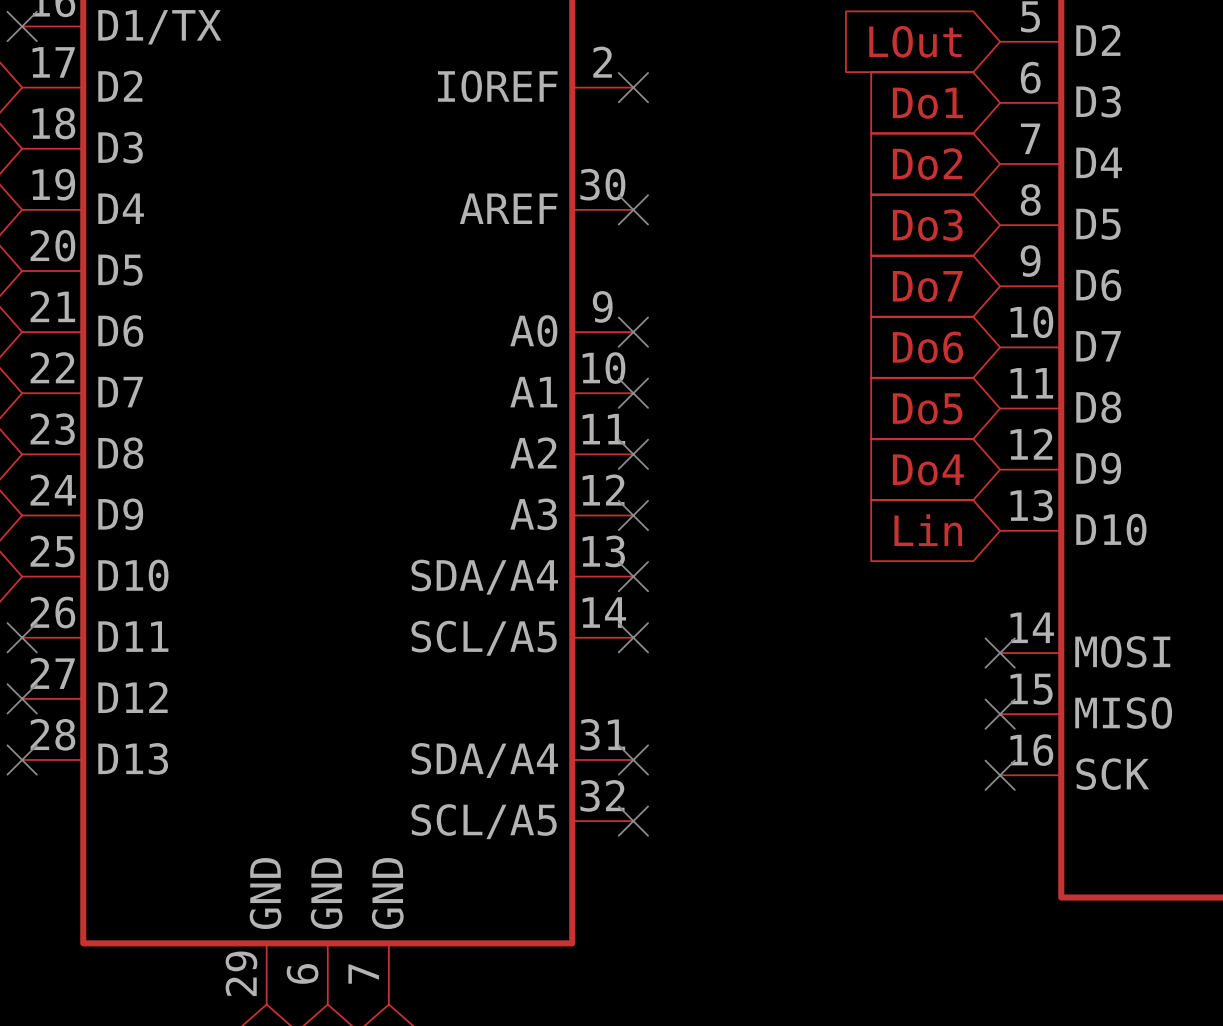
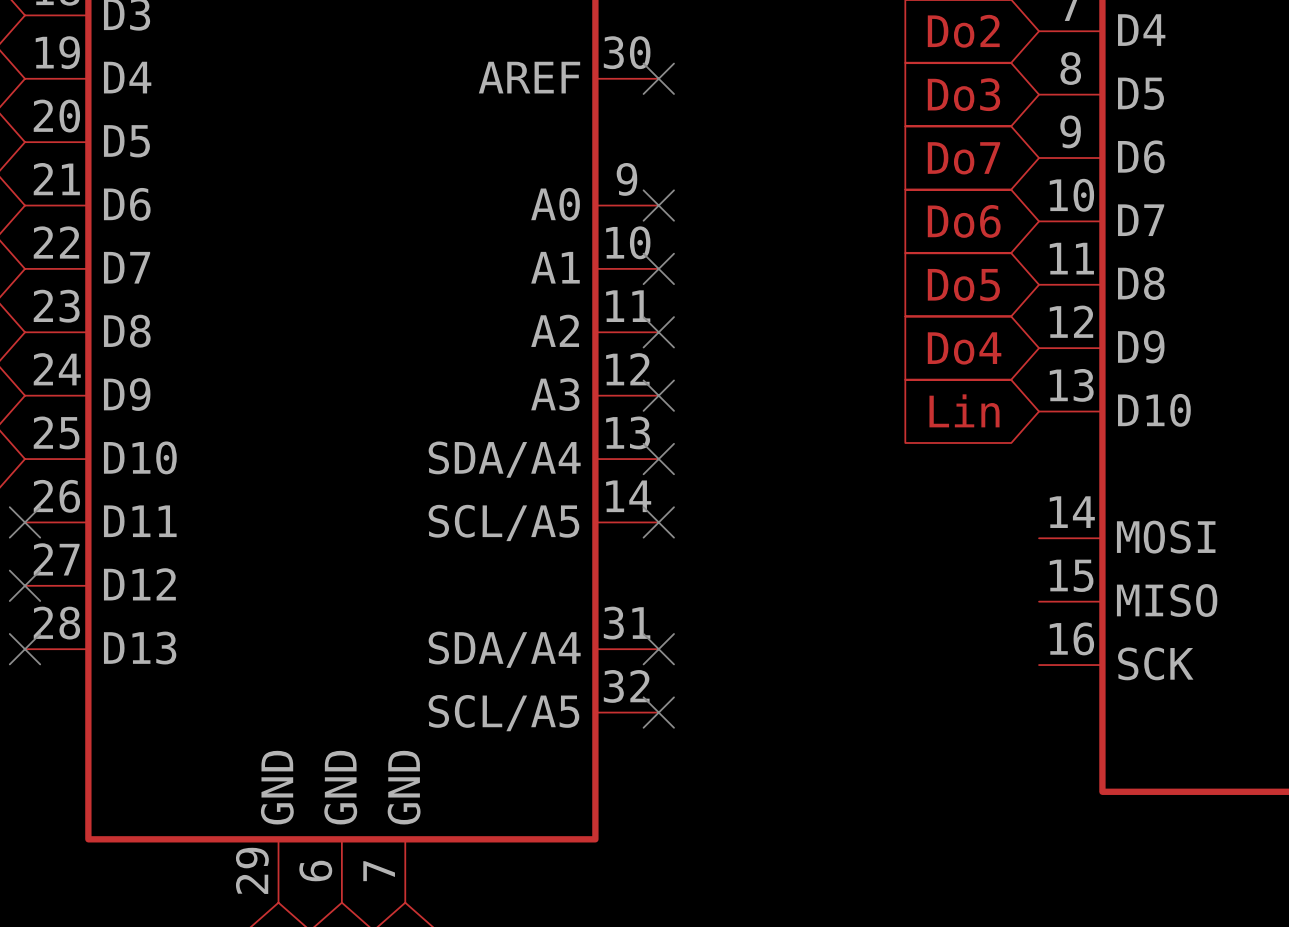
no-connect mark: (1000, 653) -> none
no-connect mark: (1000, 714) -> none
no-connect mark: (1000, 775) -> none

